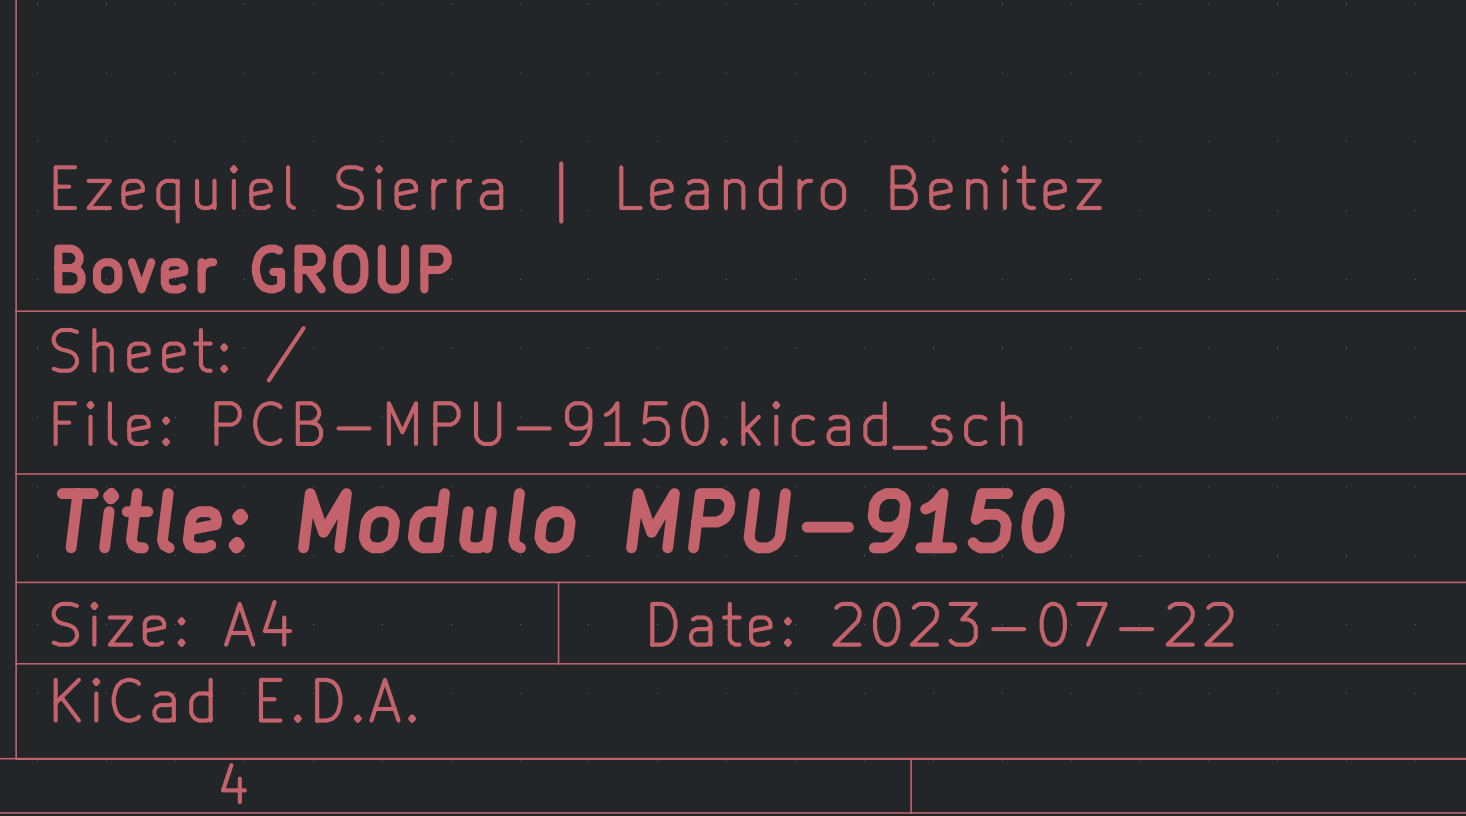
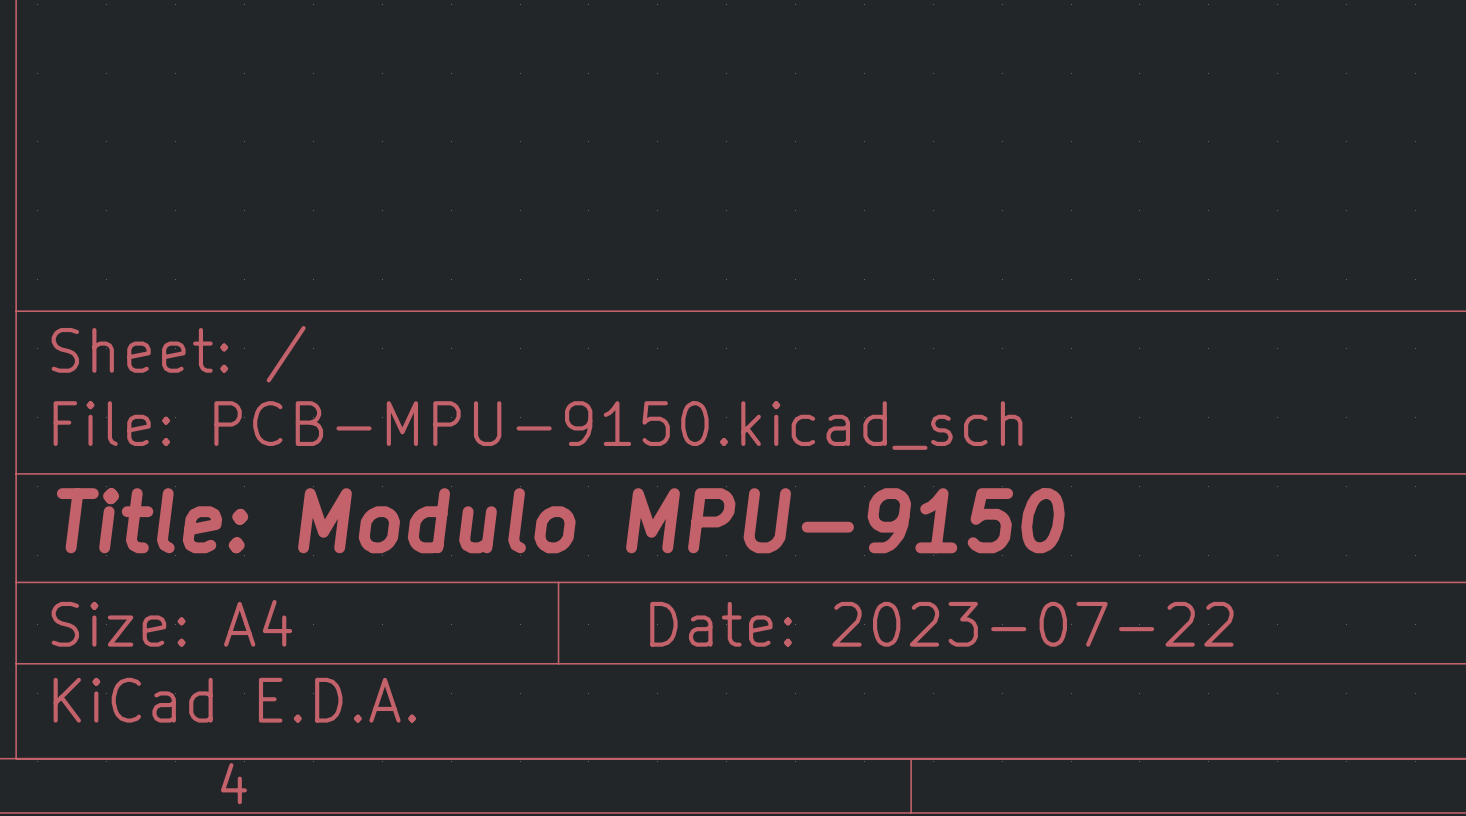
title block: Ezequiel Sierra | Leandro Benitez (577, 192) -> none
title block: Bover GROUP (252, 269) -> none

